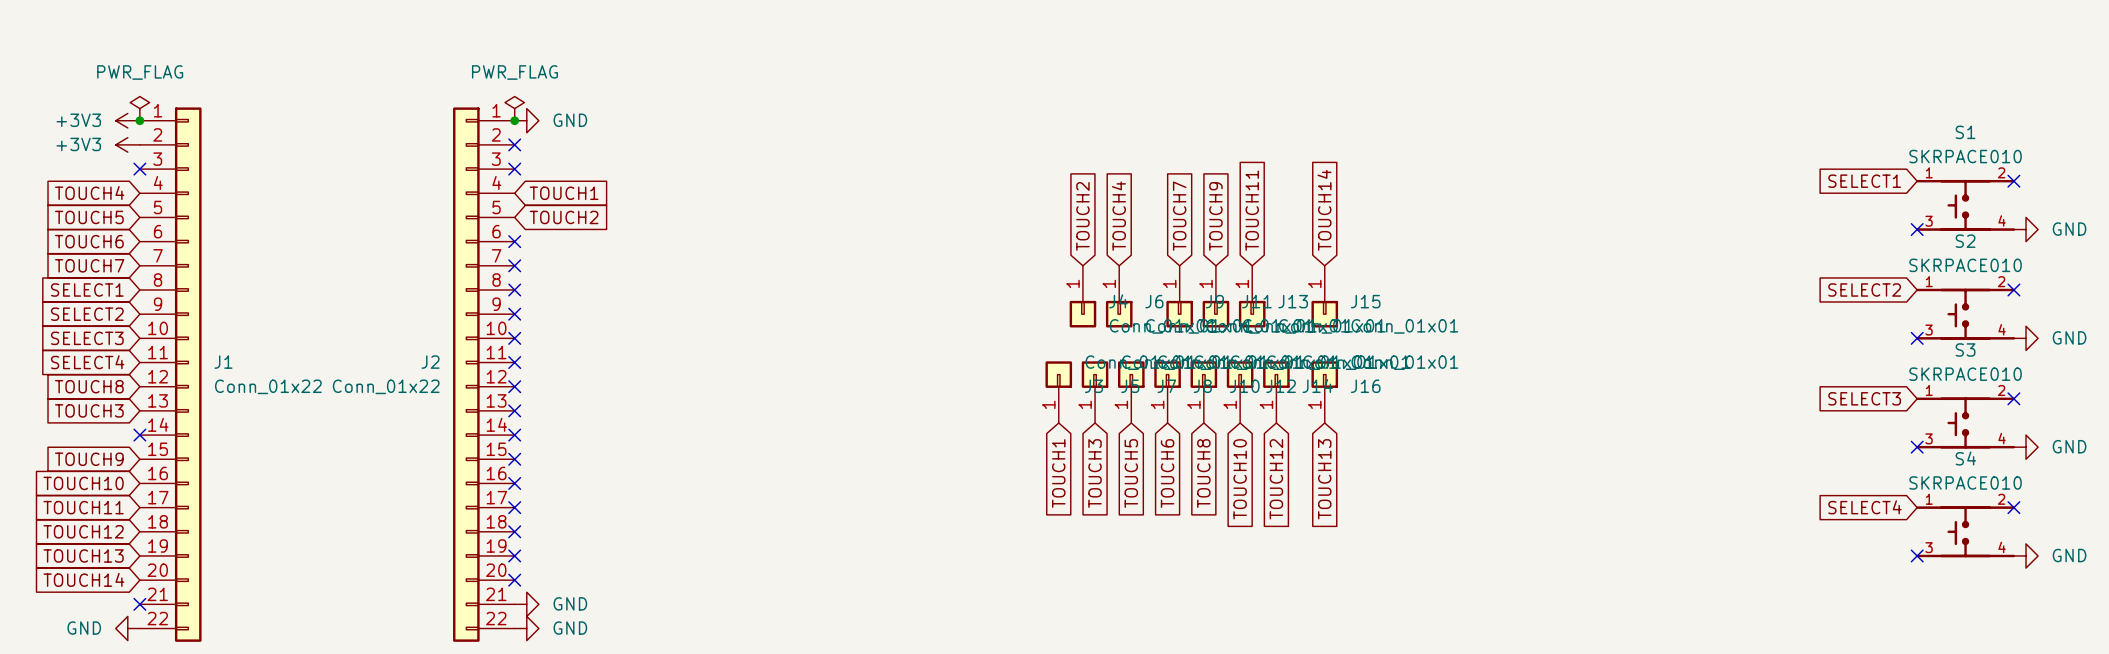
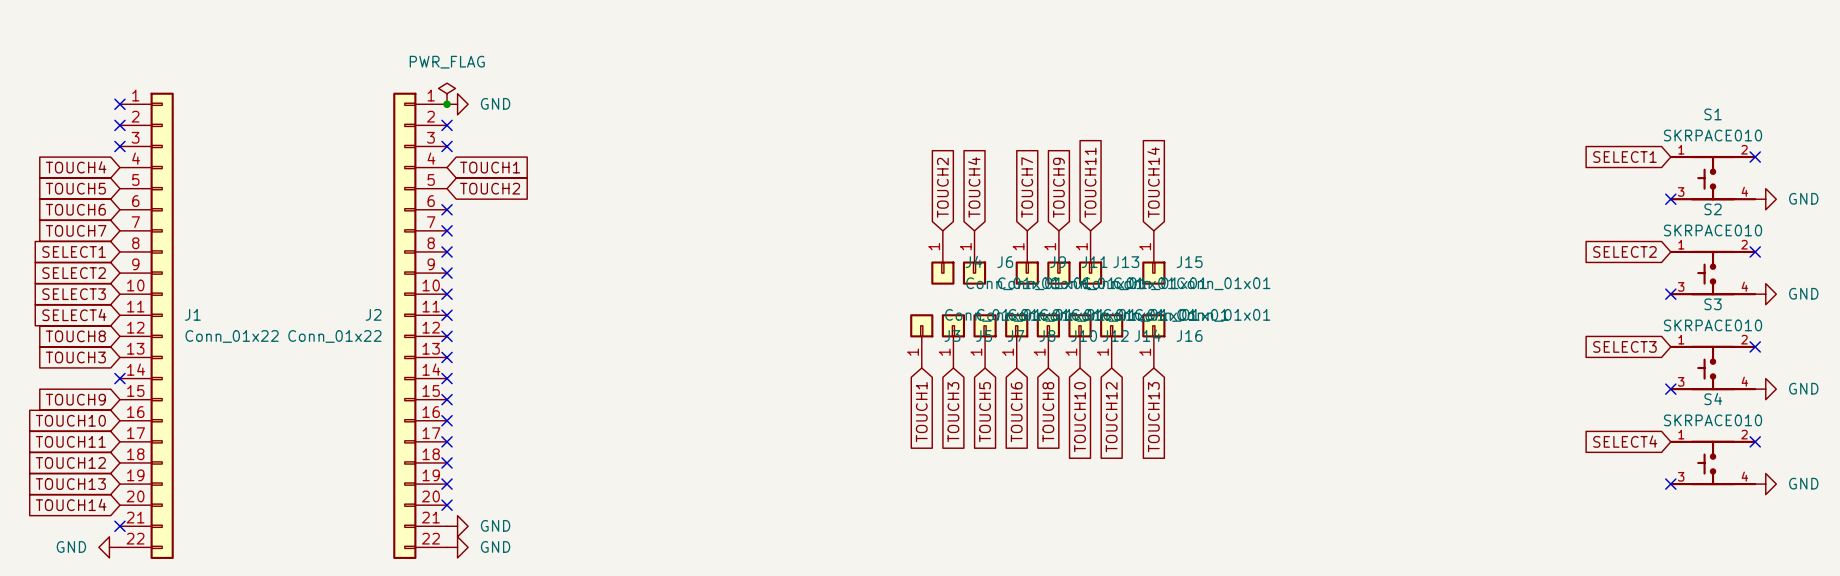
power symbol: PWR_FLAG (139, 108) -> none
power symbol: +3V3 (127, 120) -> none
junction: (139, 120) -> none
no-connect mark: none -> (119, 104)
power symbol: +3V3 (127, 144) -> none
no-connect mark: none -> (119, 125)

